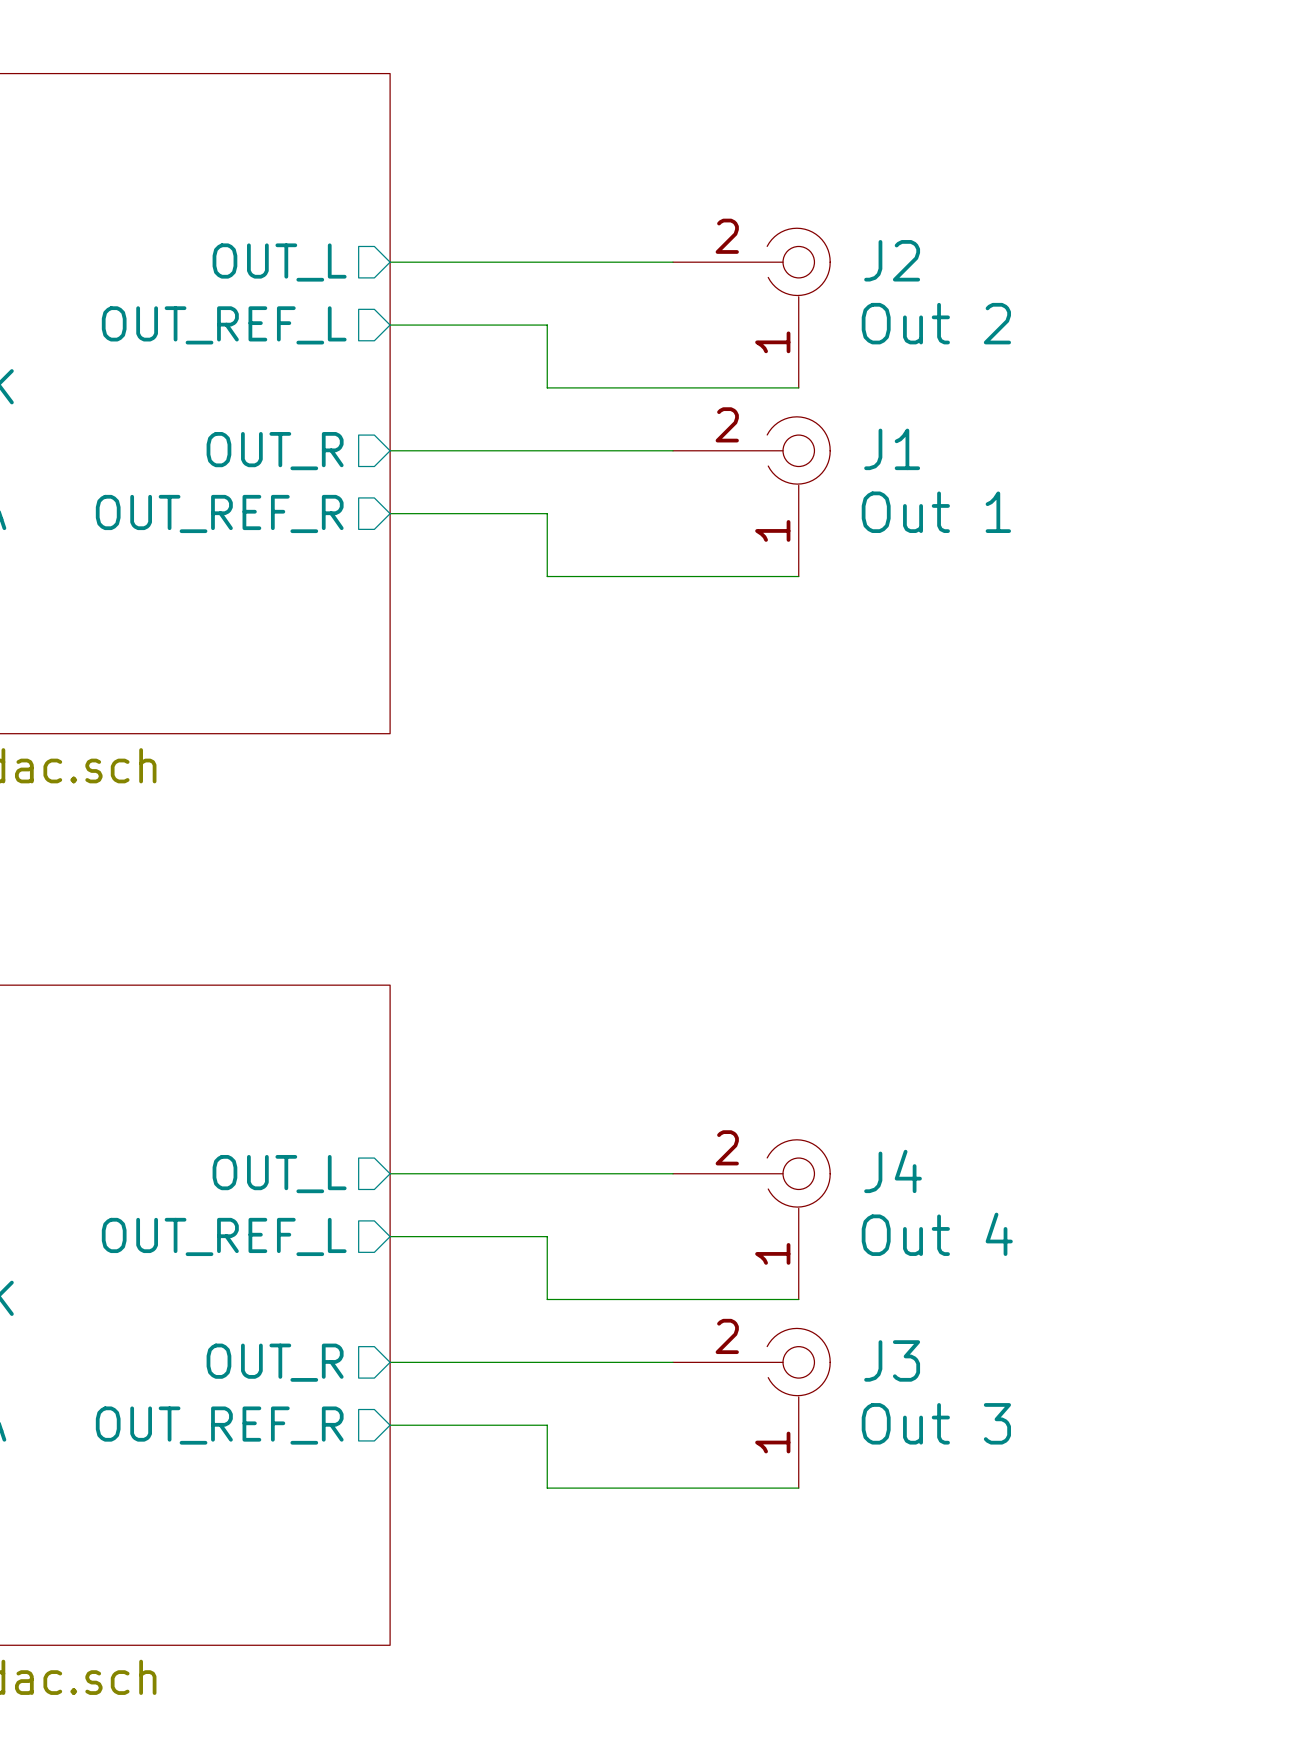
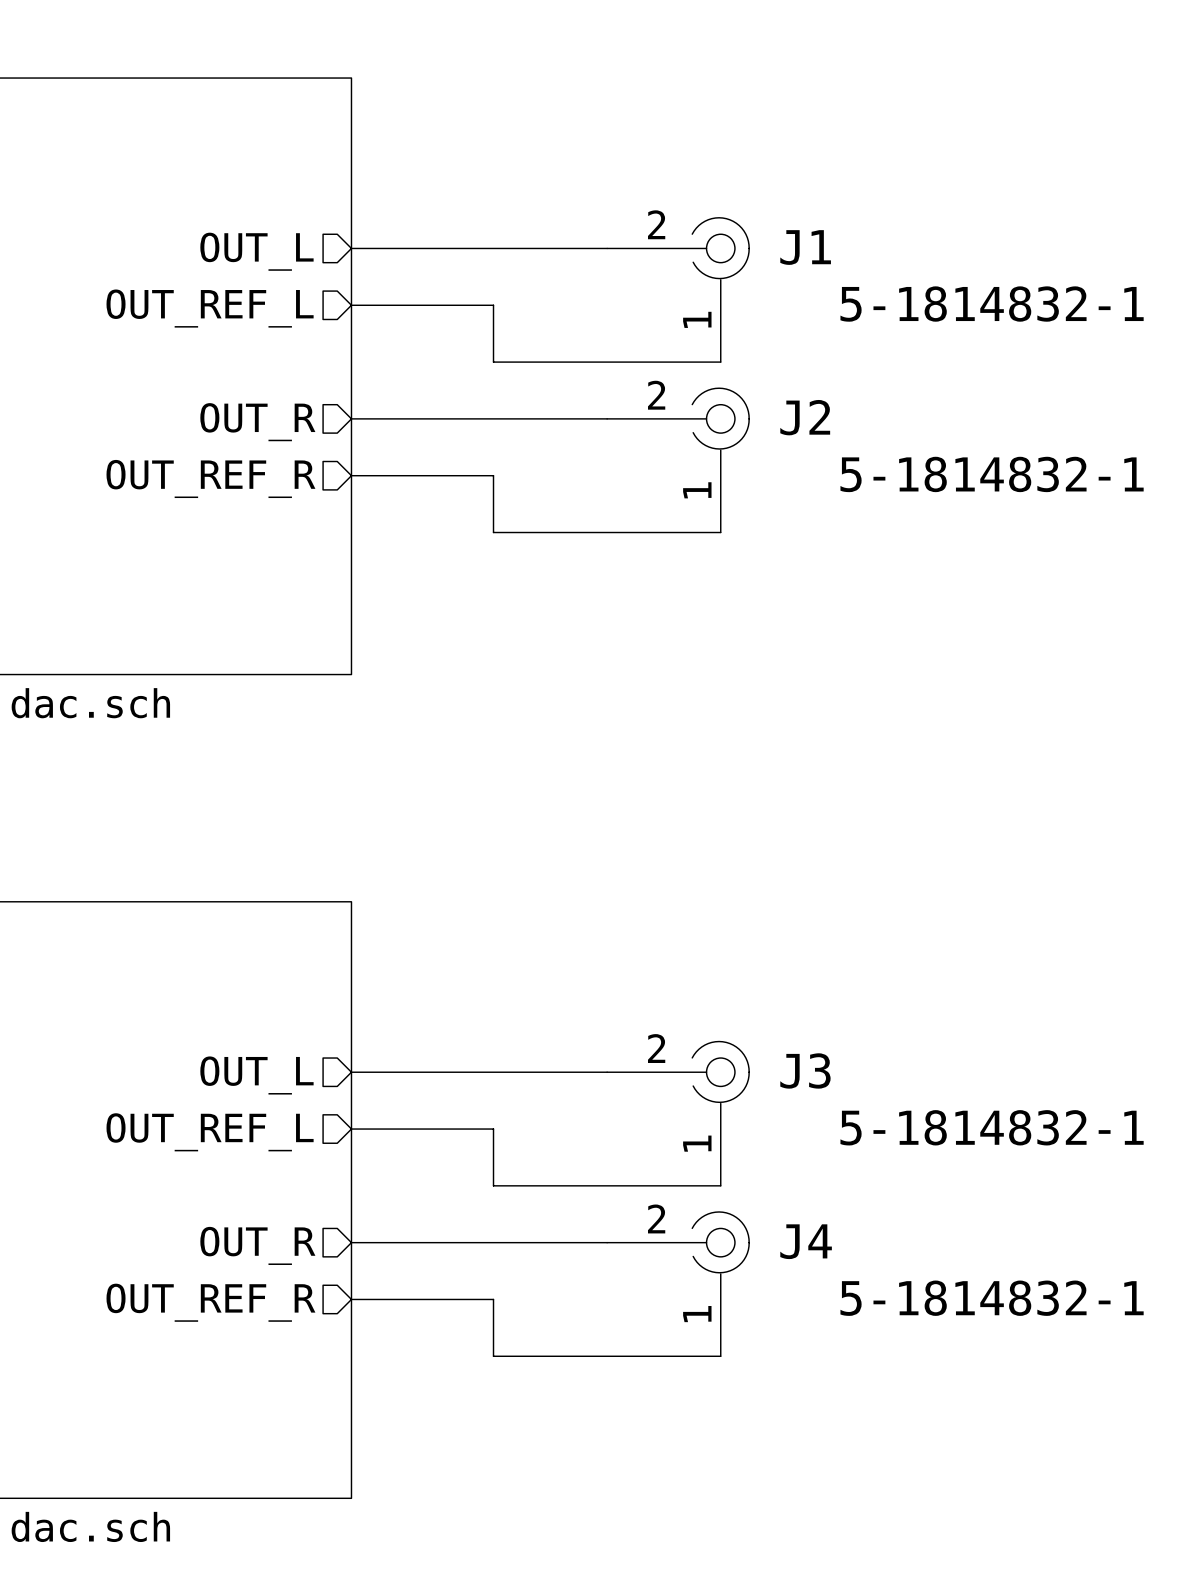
J2 name: J2 (892, 260) -> J1 (805, 247)
J2 value: Out 2 (936, 323) -> 5-1814832-1 (992, 304)
J1 name: J1 (892, 449) -> J2 (805, 417)
J1 value: Out 1 (936, 512) -> 5-1814832-1 (992, 474)
J4 name: J4 (893, 1171) -> J3 (805, 1070)
J4 value: Out 4 (937, 1234) -> 5-1814832-1 (992, 1127)
J3 name: J3 (892, 1360) -> J4 (806, 1241)
J3 value: Out 3 (936, 1423) -> 5-1814832-1 (992, 1298)

